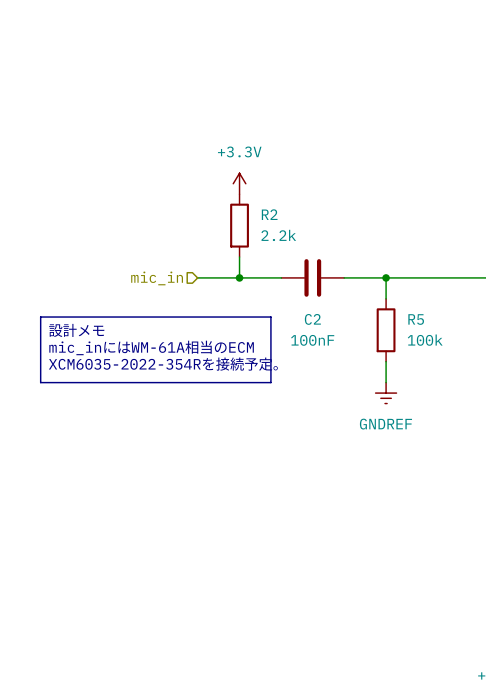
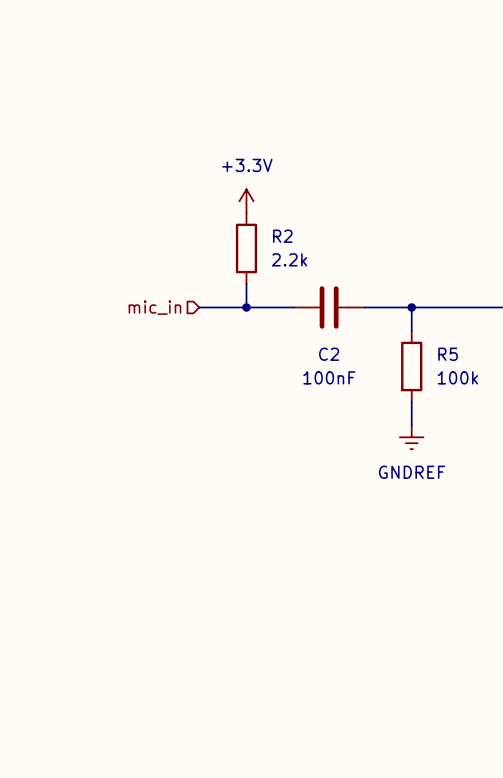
line: (40, 317) (270, 317) (270, 382) (40, 382) (40, 317) -> none
text: 設計メモ (76, 330) -> none
text: mic_inにはWM-61A相当のECM (151, 347) -> none
text: XCM6035-2022-354Rを接続予定。 (163, 364) -> none

